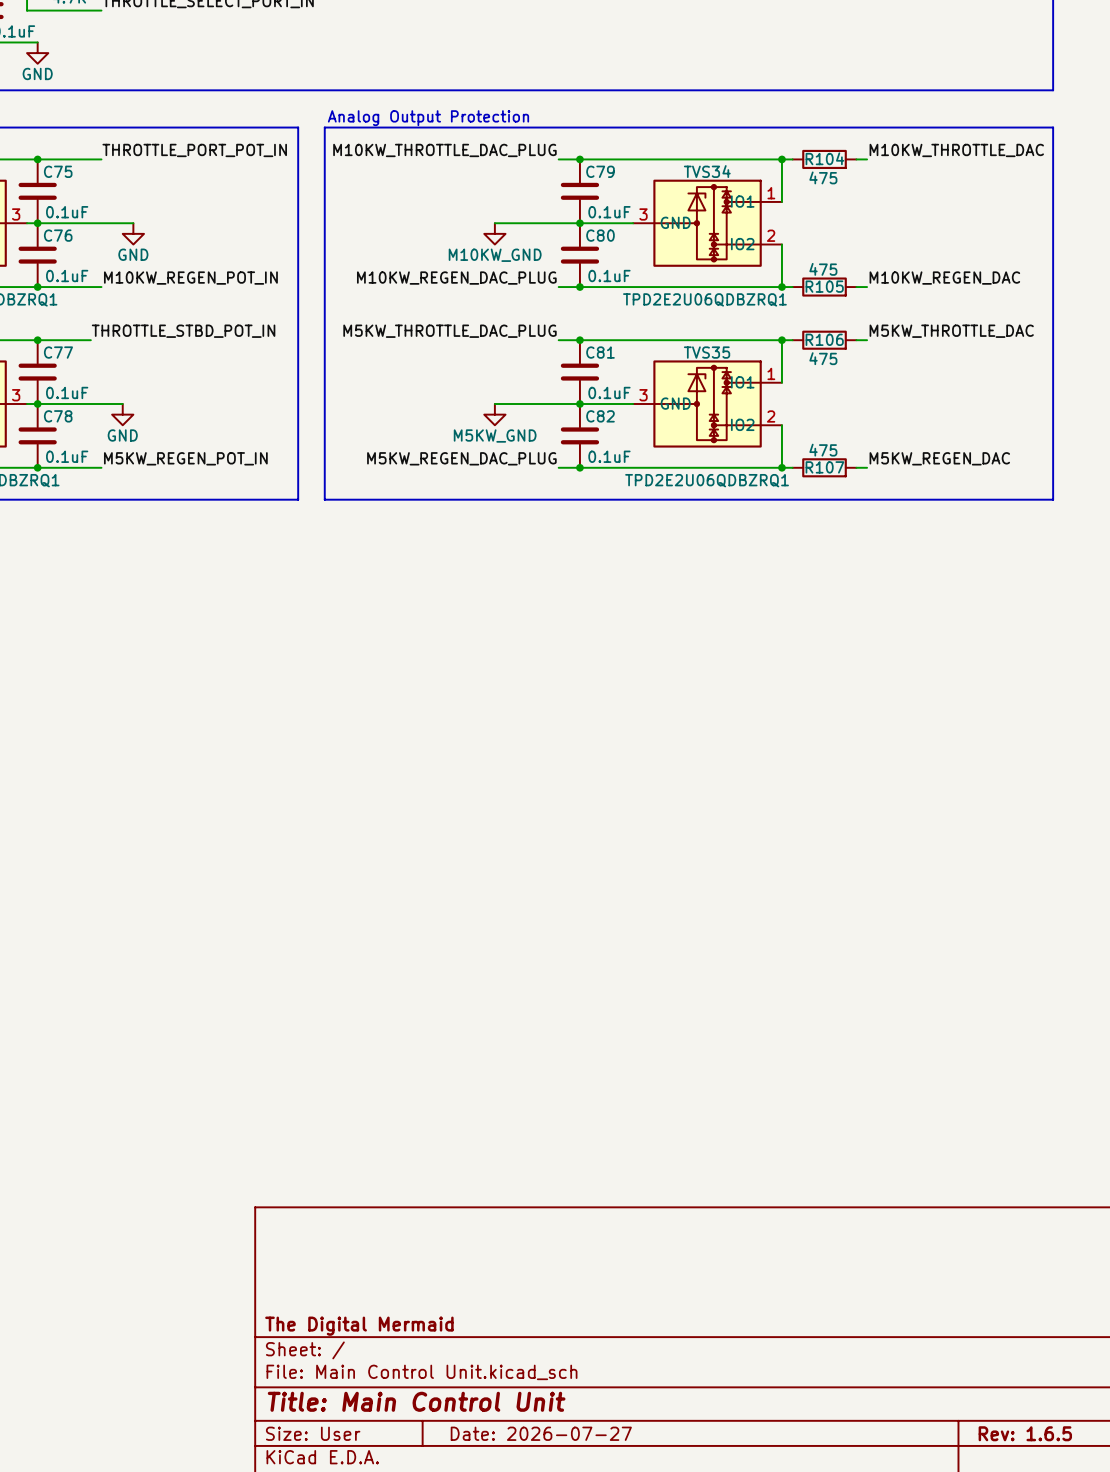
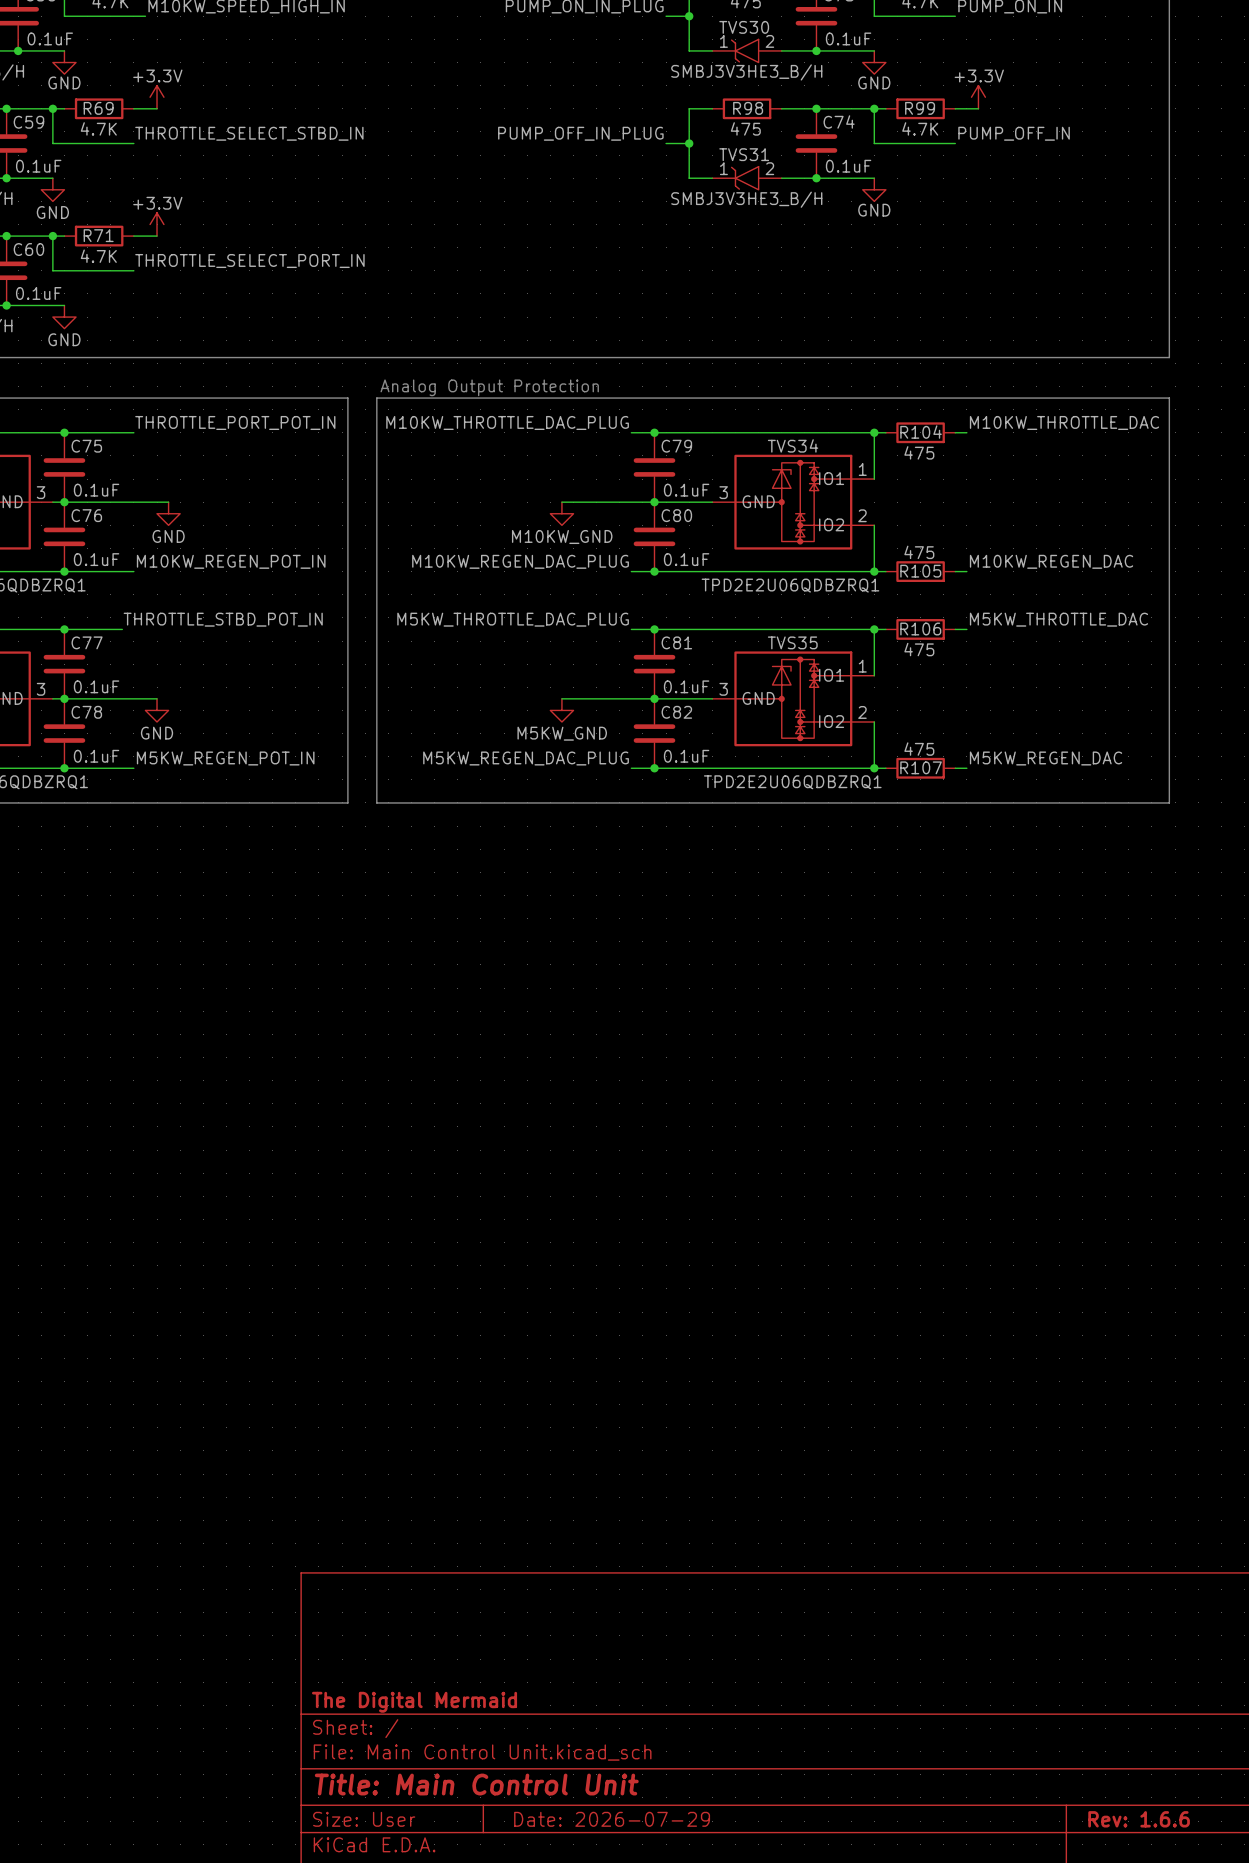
title block: Date: 2026-07-27 (541, 1433) -> Date: 2026-07-29 (612, 1819)
title block: Rev: 1.6.5 (1025, 1433) -> Rev: 1.6.6 (1139, 1819)

